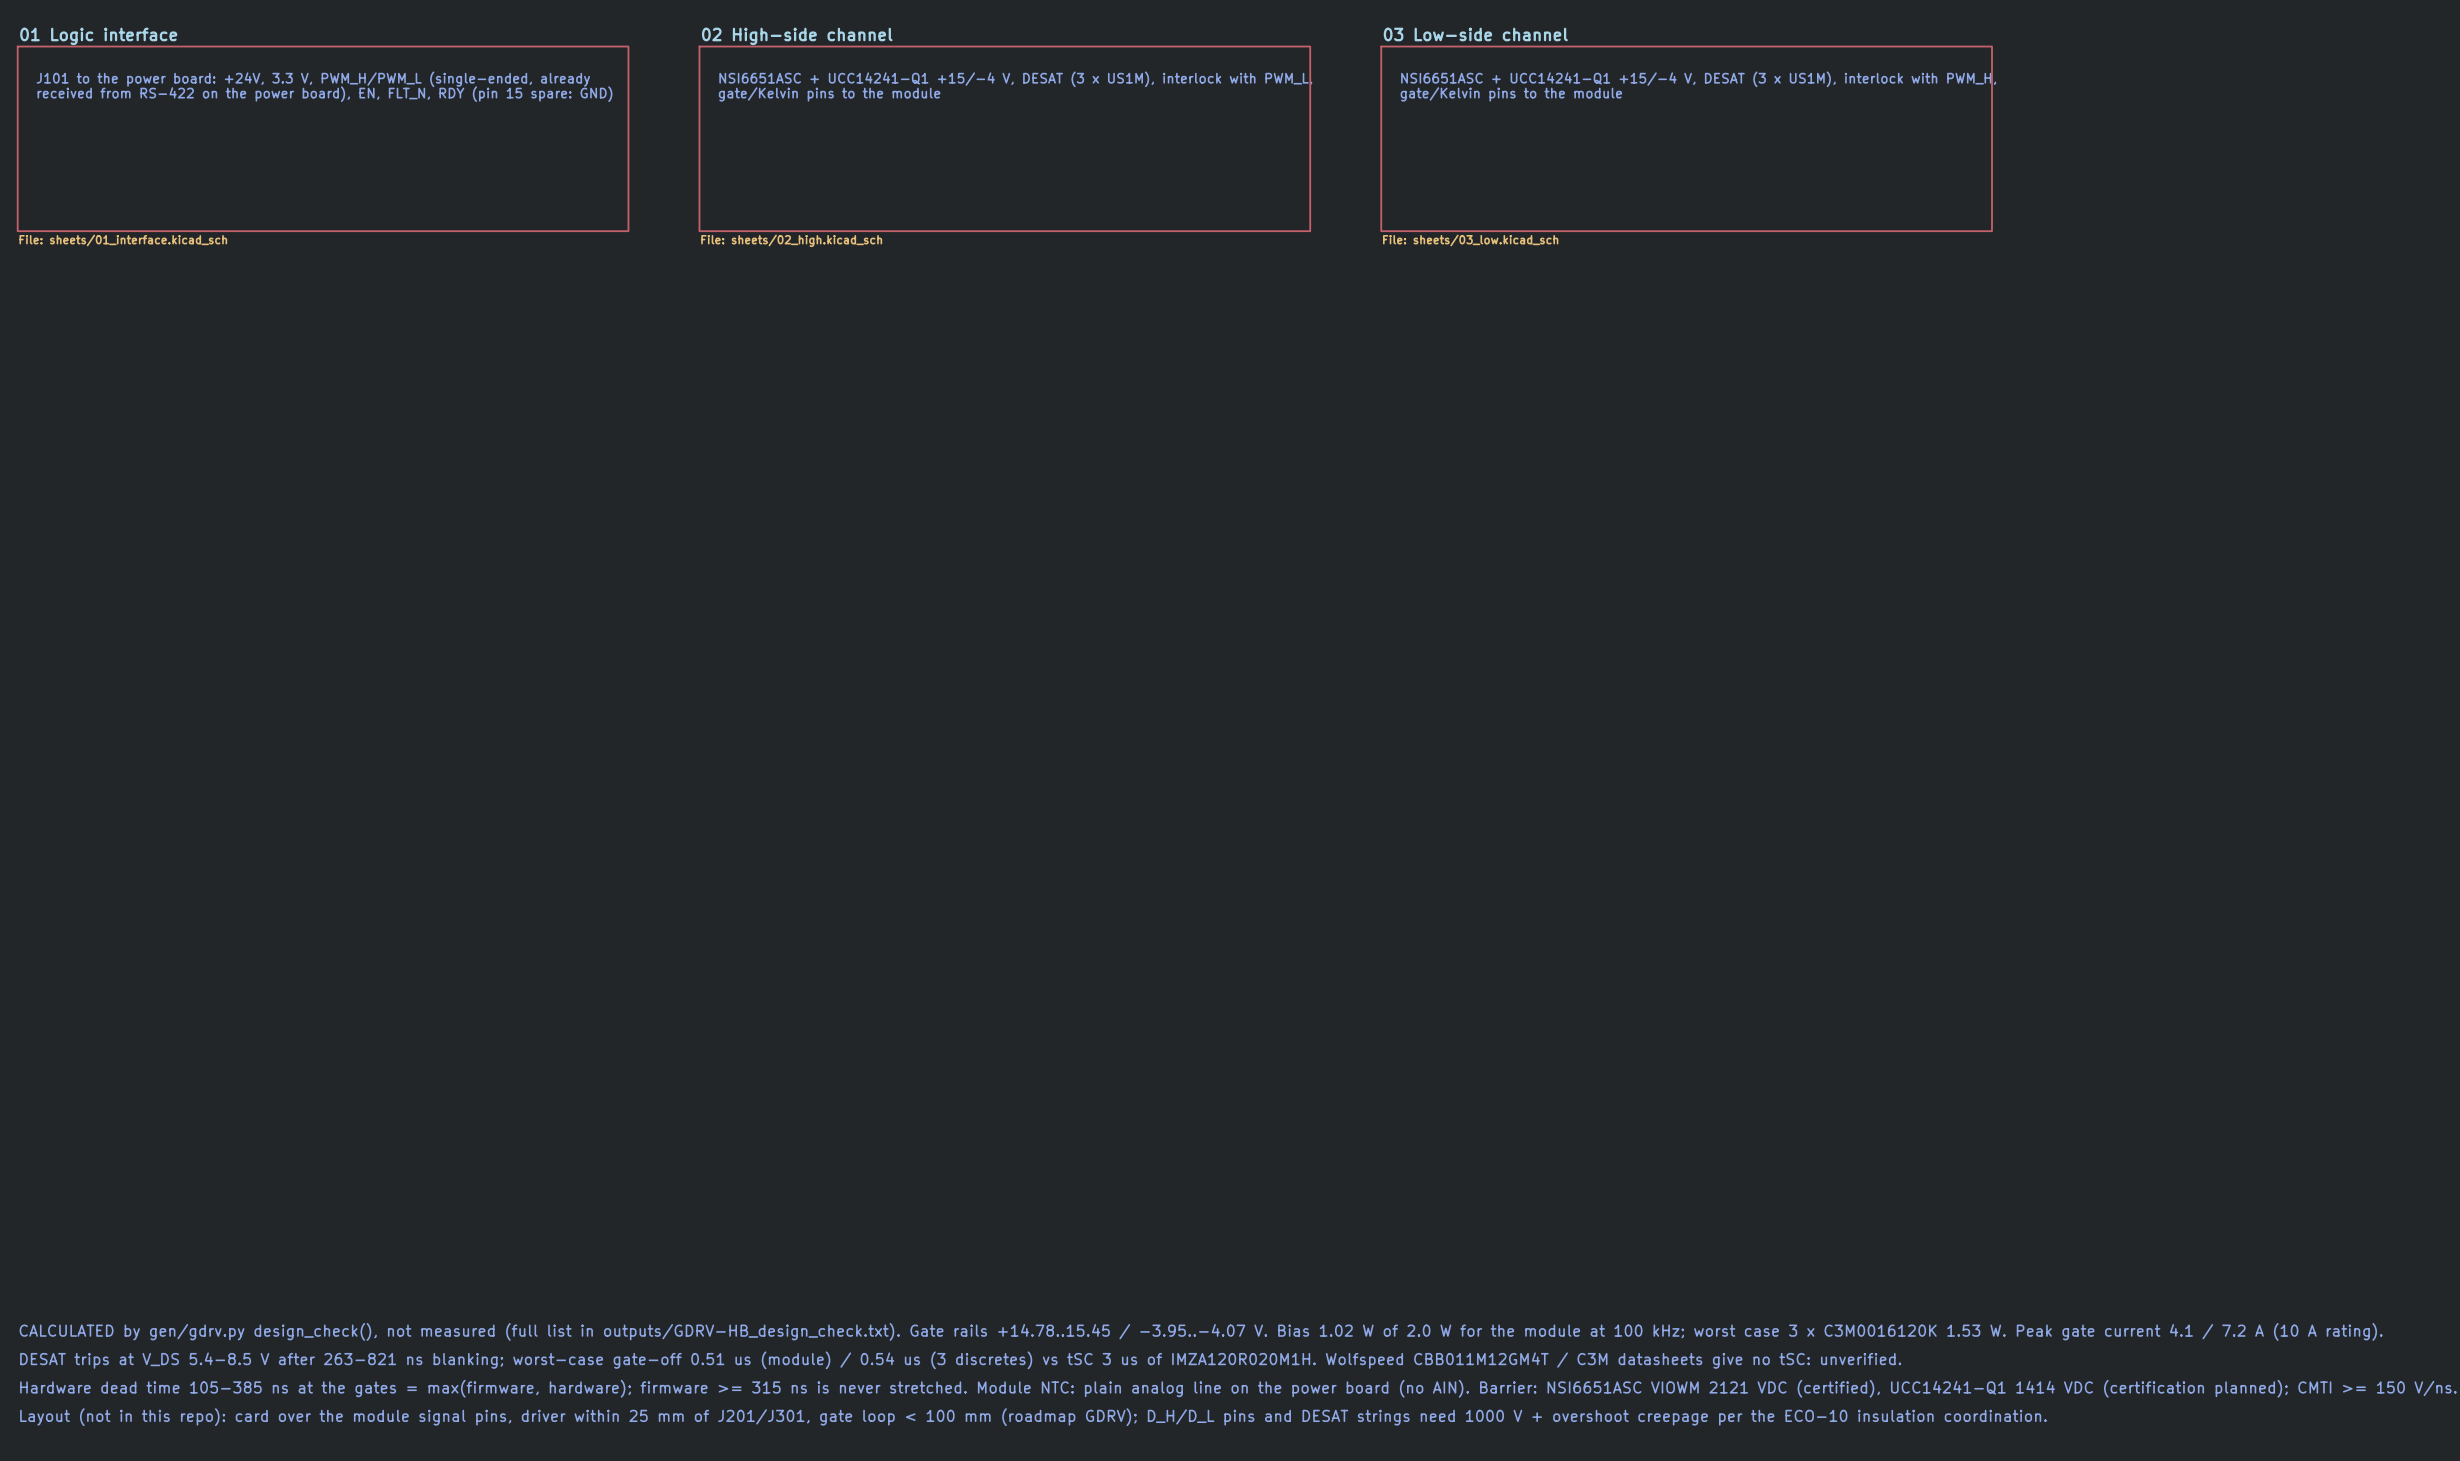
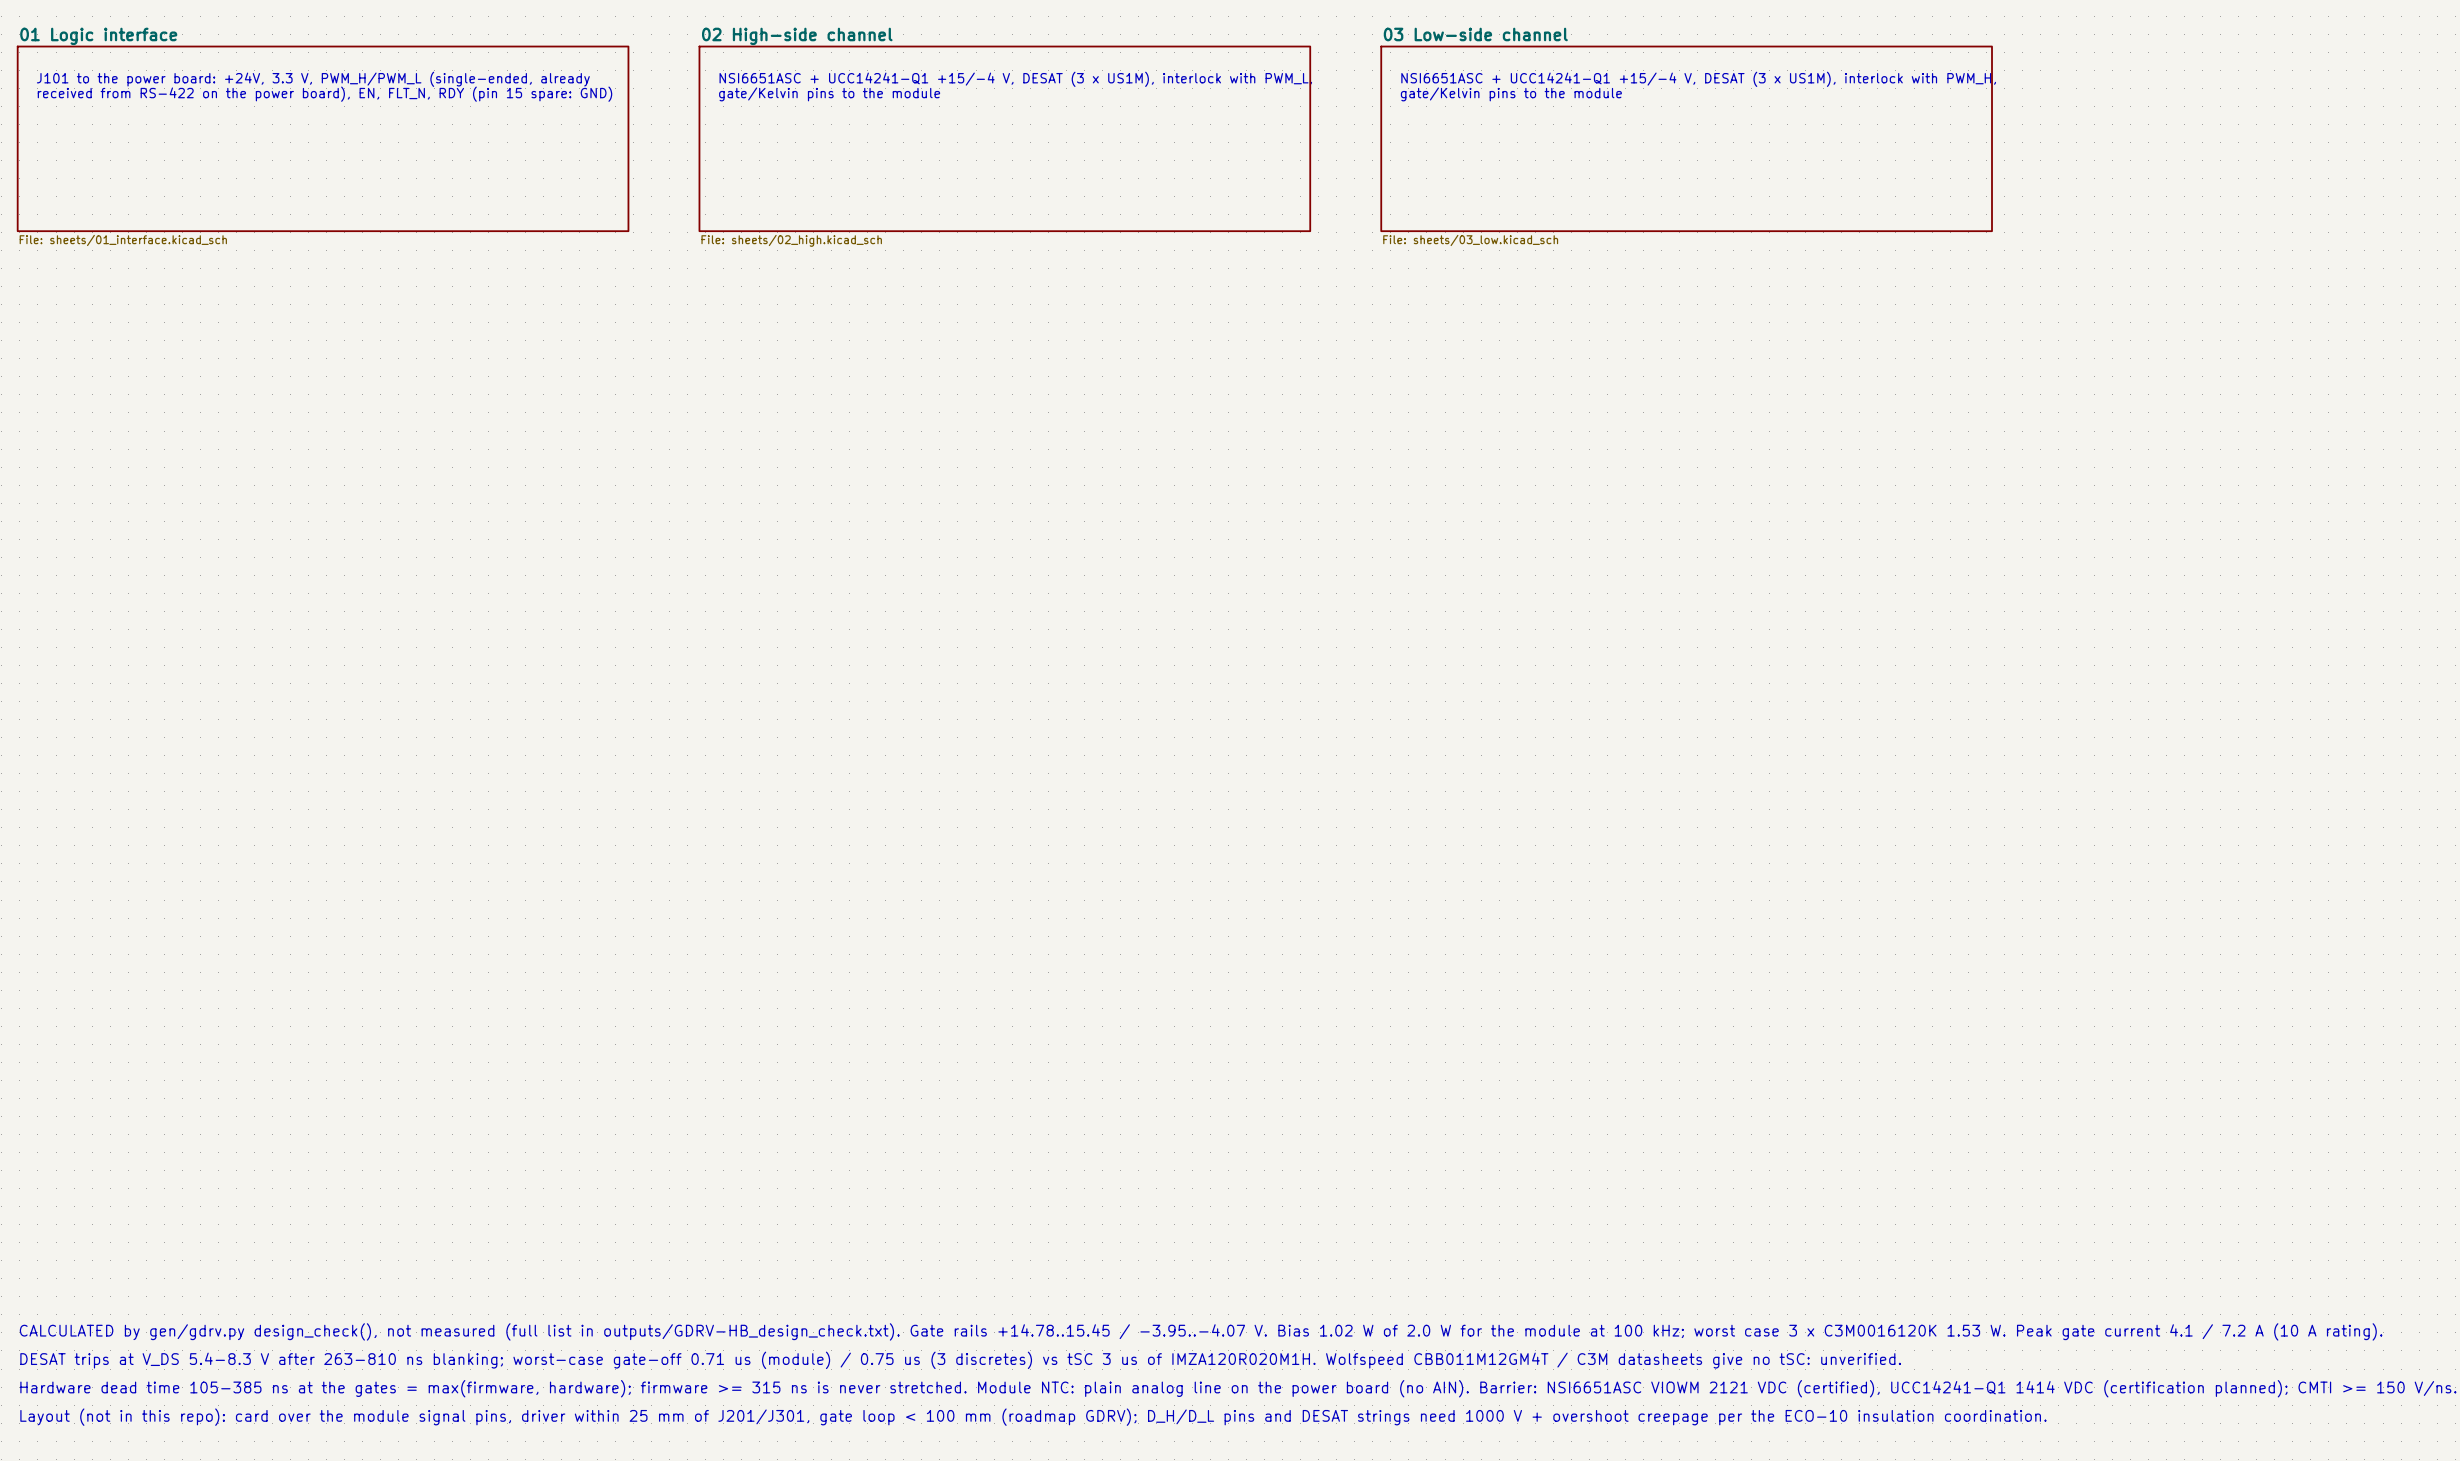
text: DESAT trips at V_DS 5.4-8.5 V after 263-821 ns blanking; worst-case gate-off 0.51 us (module) / 0.54 us (3 discretes) vs tSC 3 us of IMZA120R020M1H. Wolfspeed CBB011M12GM4T / C3M datasheets give no tSC: unverified. (960, 1360) -> DESAT trips at V_DS 5.4-8.3 V after 263-810 ns blanking; worst-case gate-off 0.71 us (module) / 0.75 us (3 discretes) vs tSC 3 us of IMZA120R020M1H. Wolfspeed CBB011M12GM4T / C3M datasheets give no tSC: unverified. (960, 1360)

